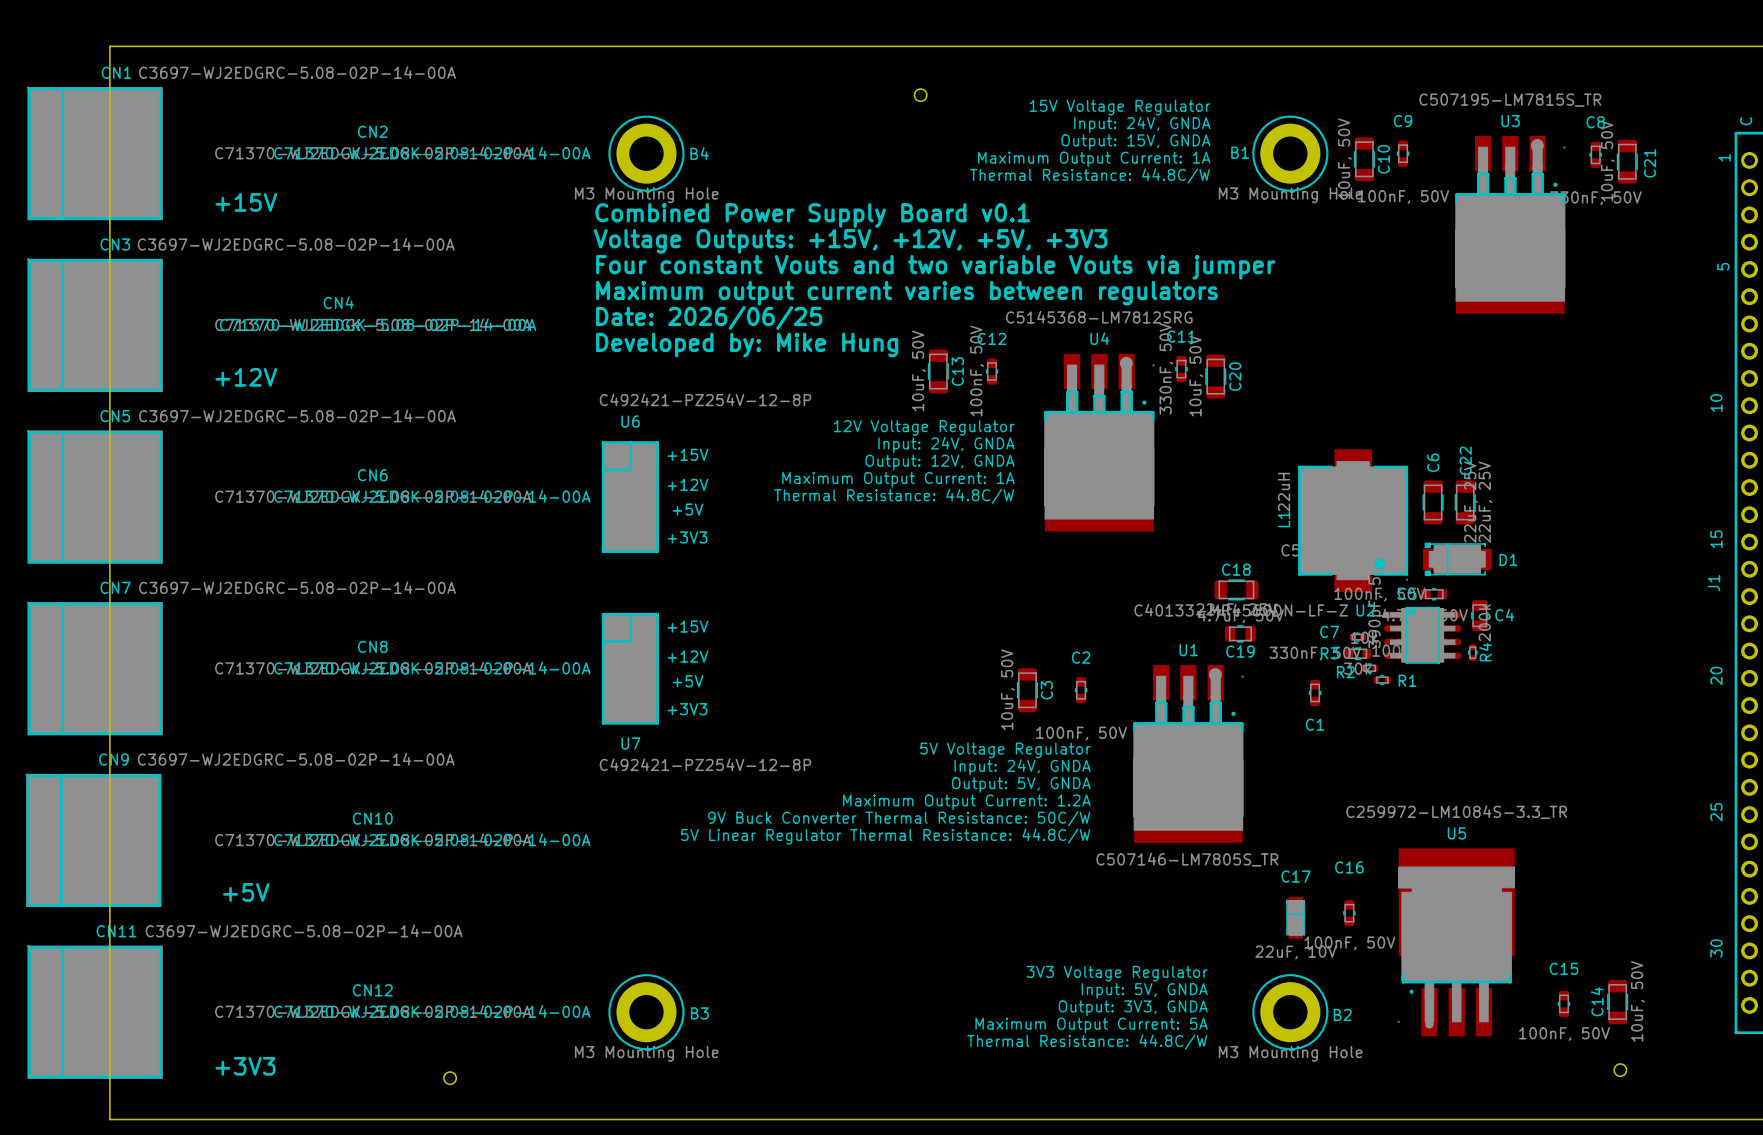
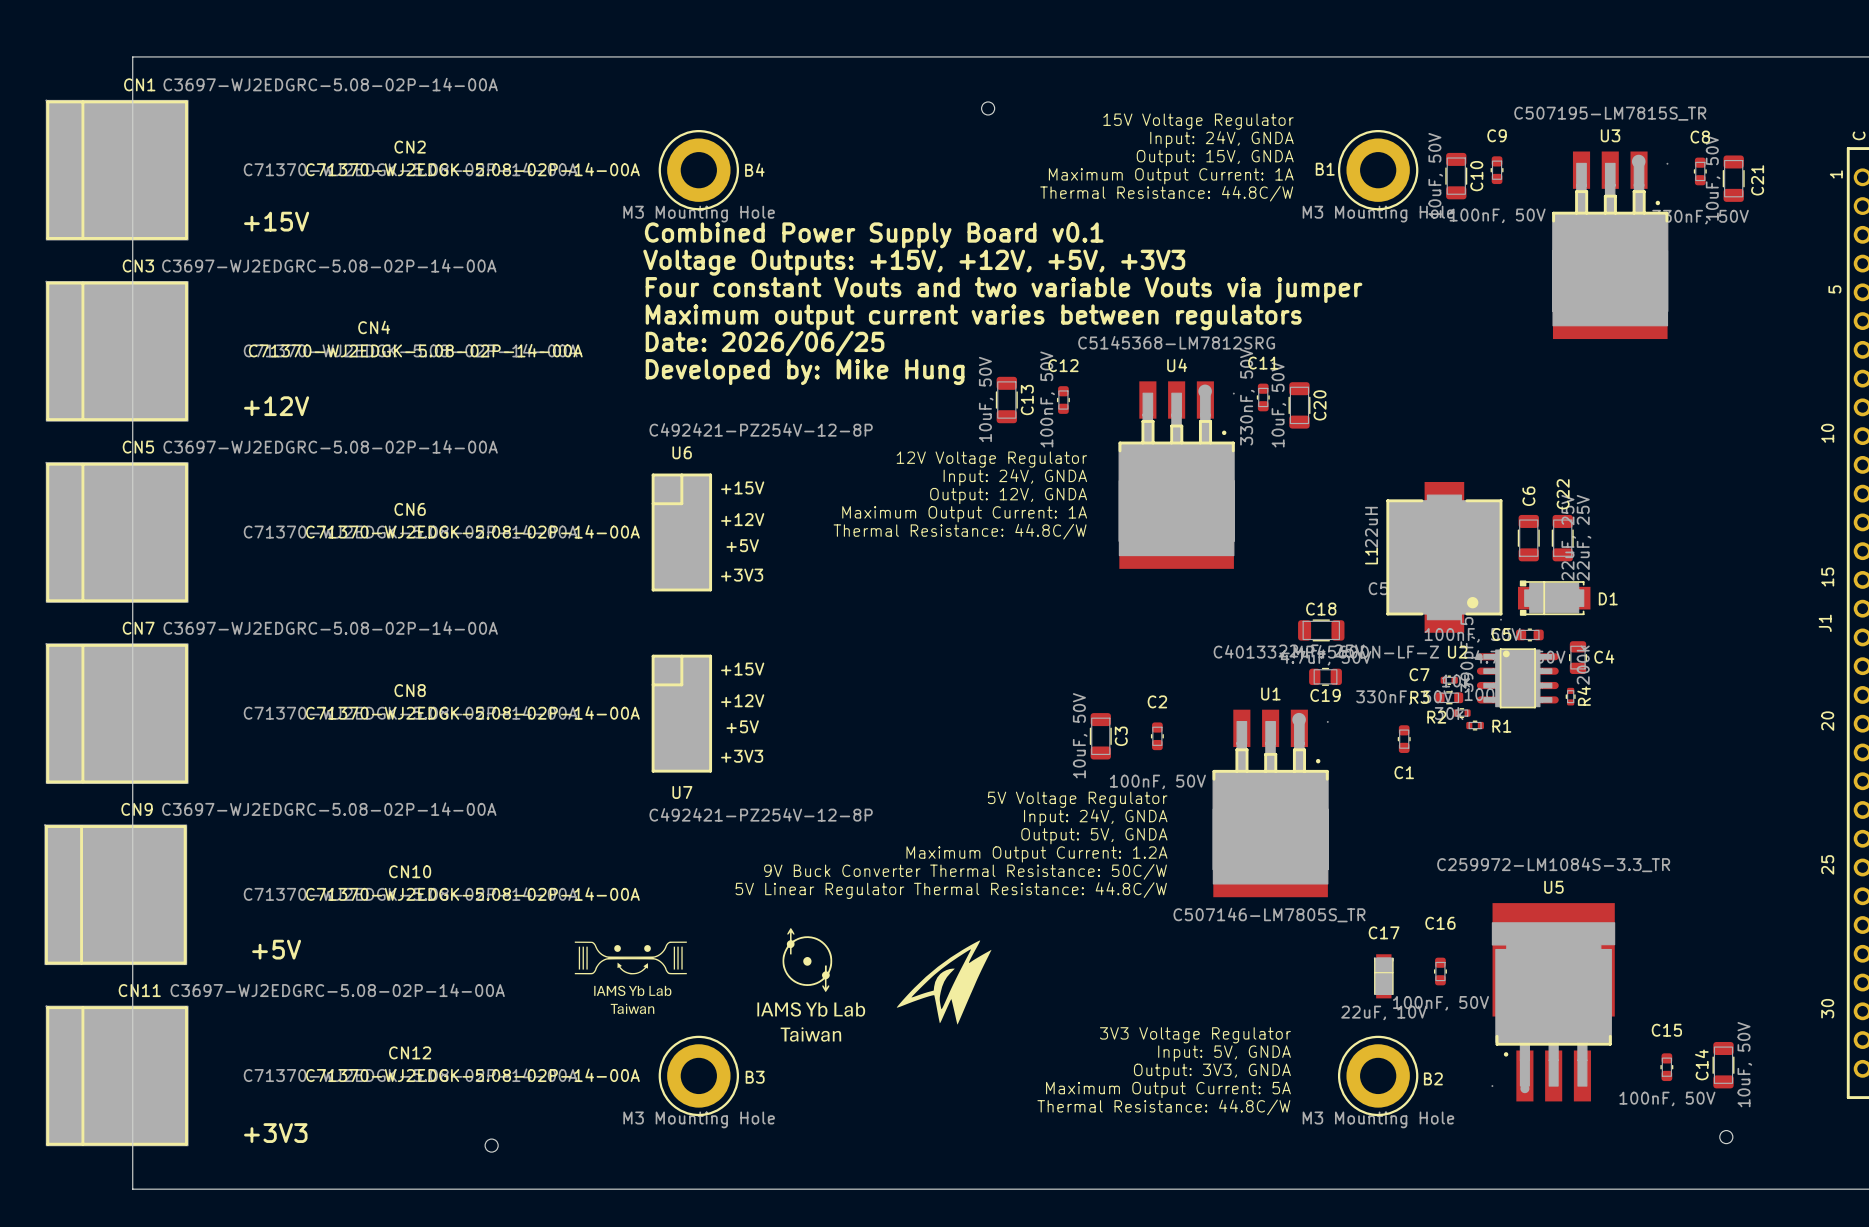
drawing: none -> [757, 927, 866, 1042]
drawing: none -> [896, 940, 992, 1025]
drawing: none -> [574, 941, 687, 1014]

